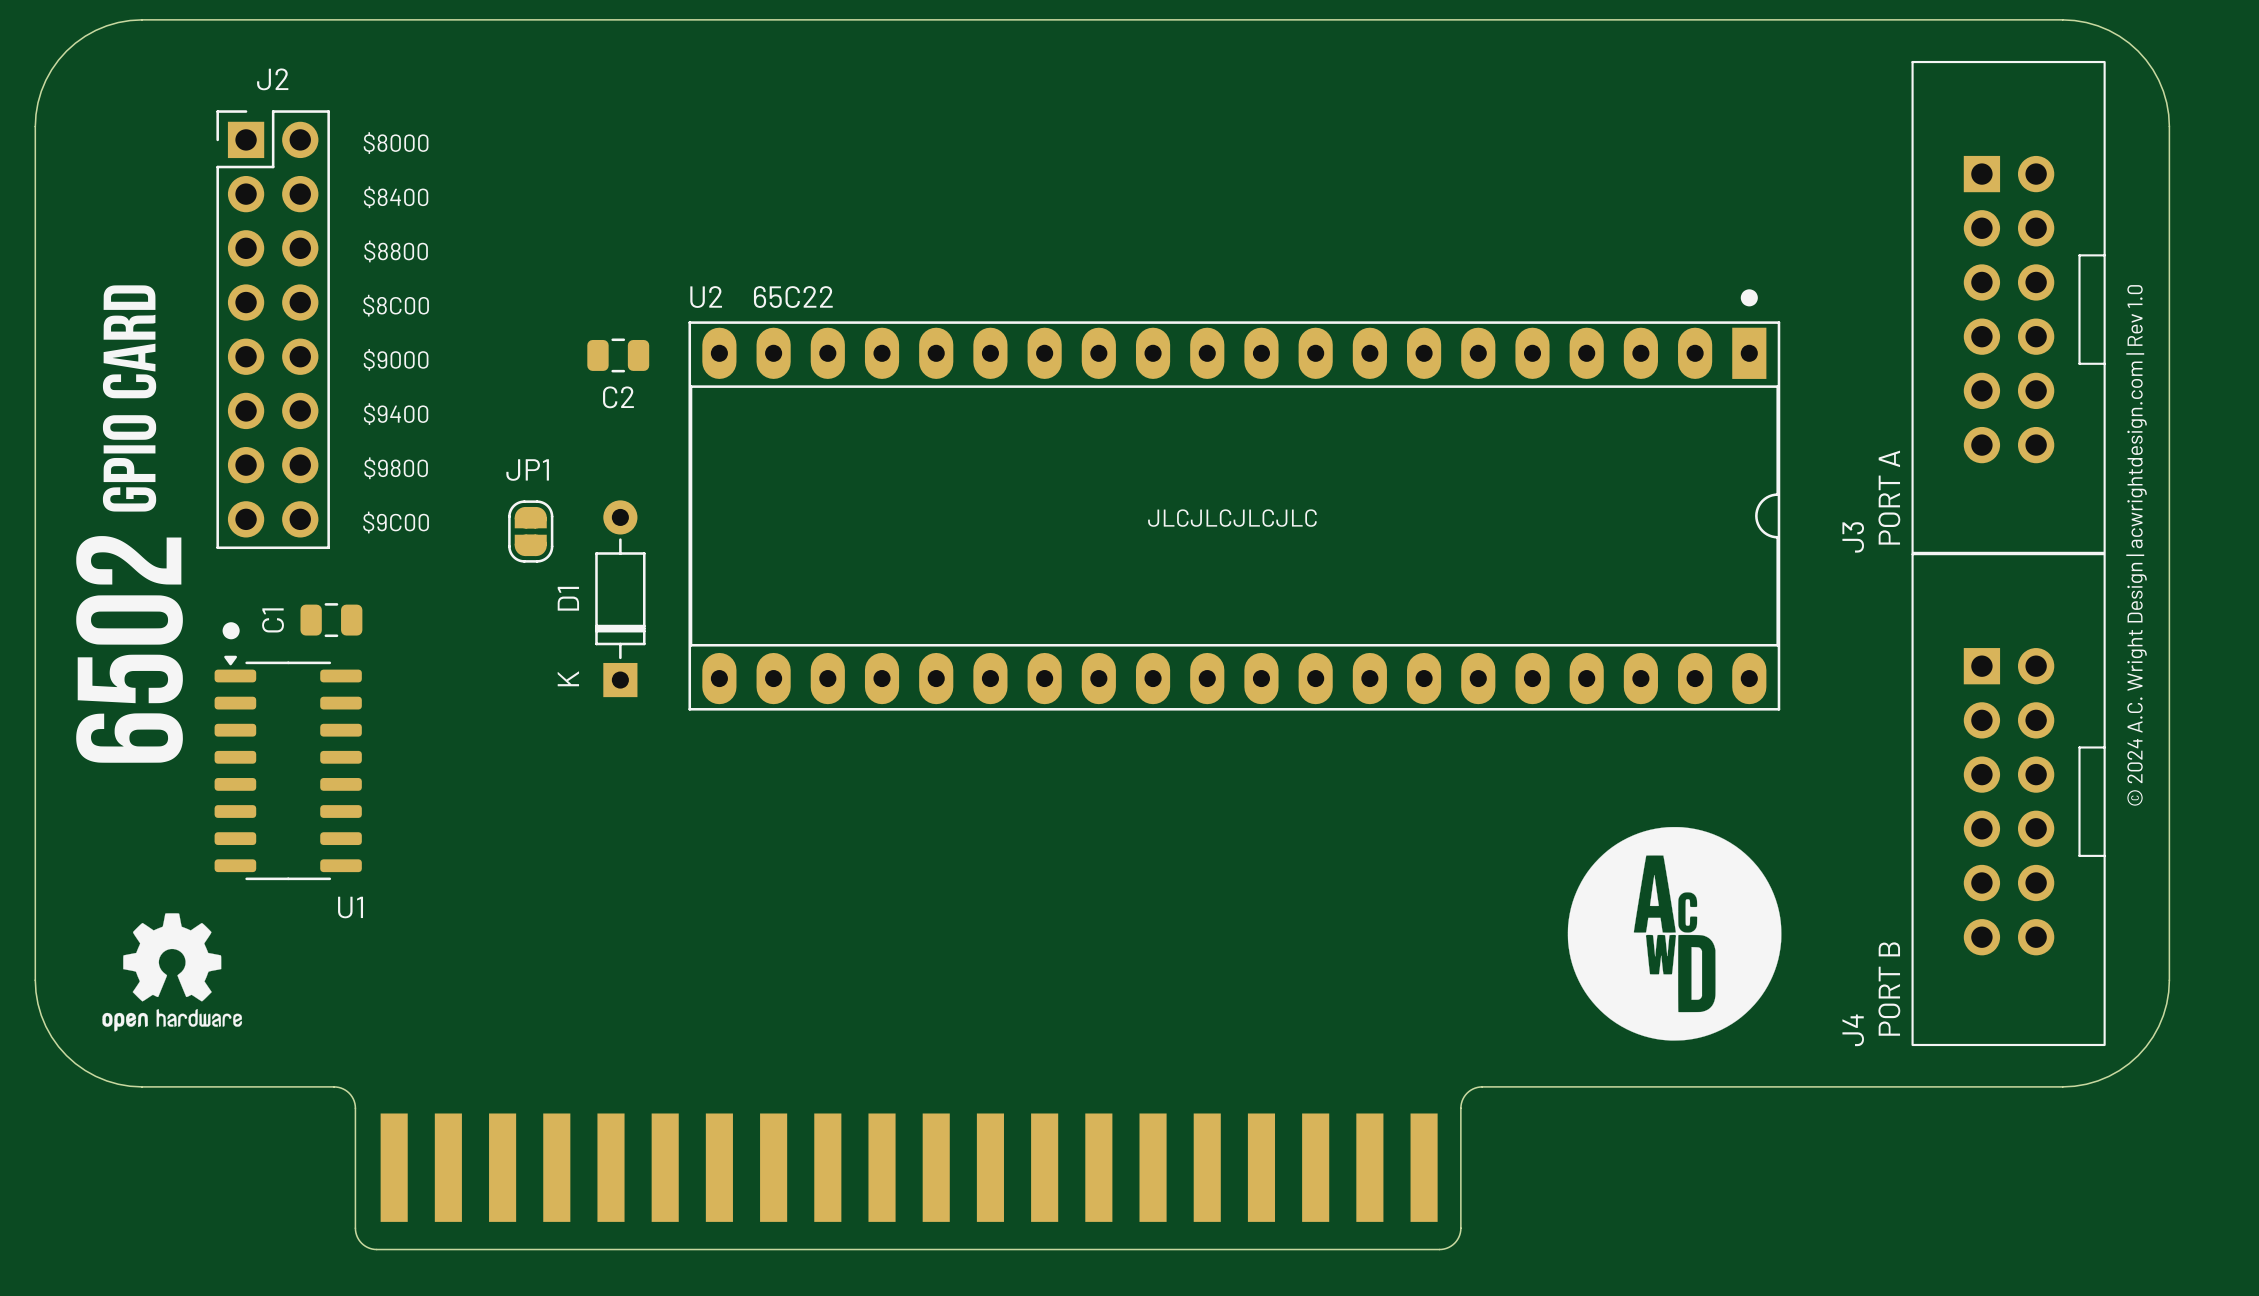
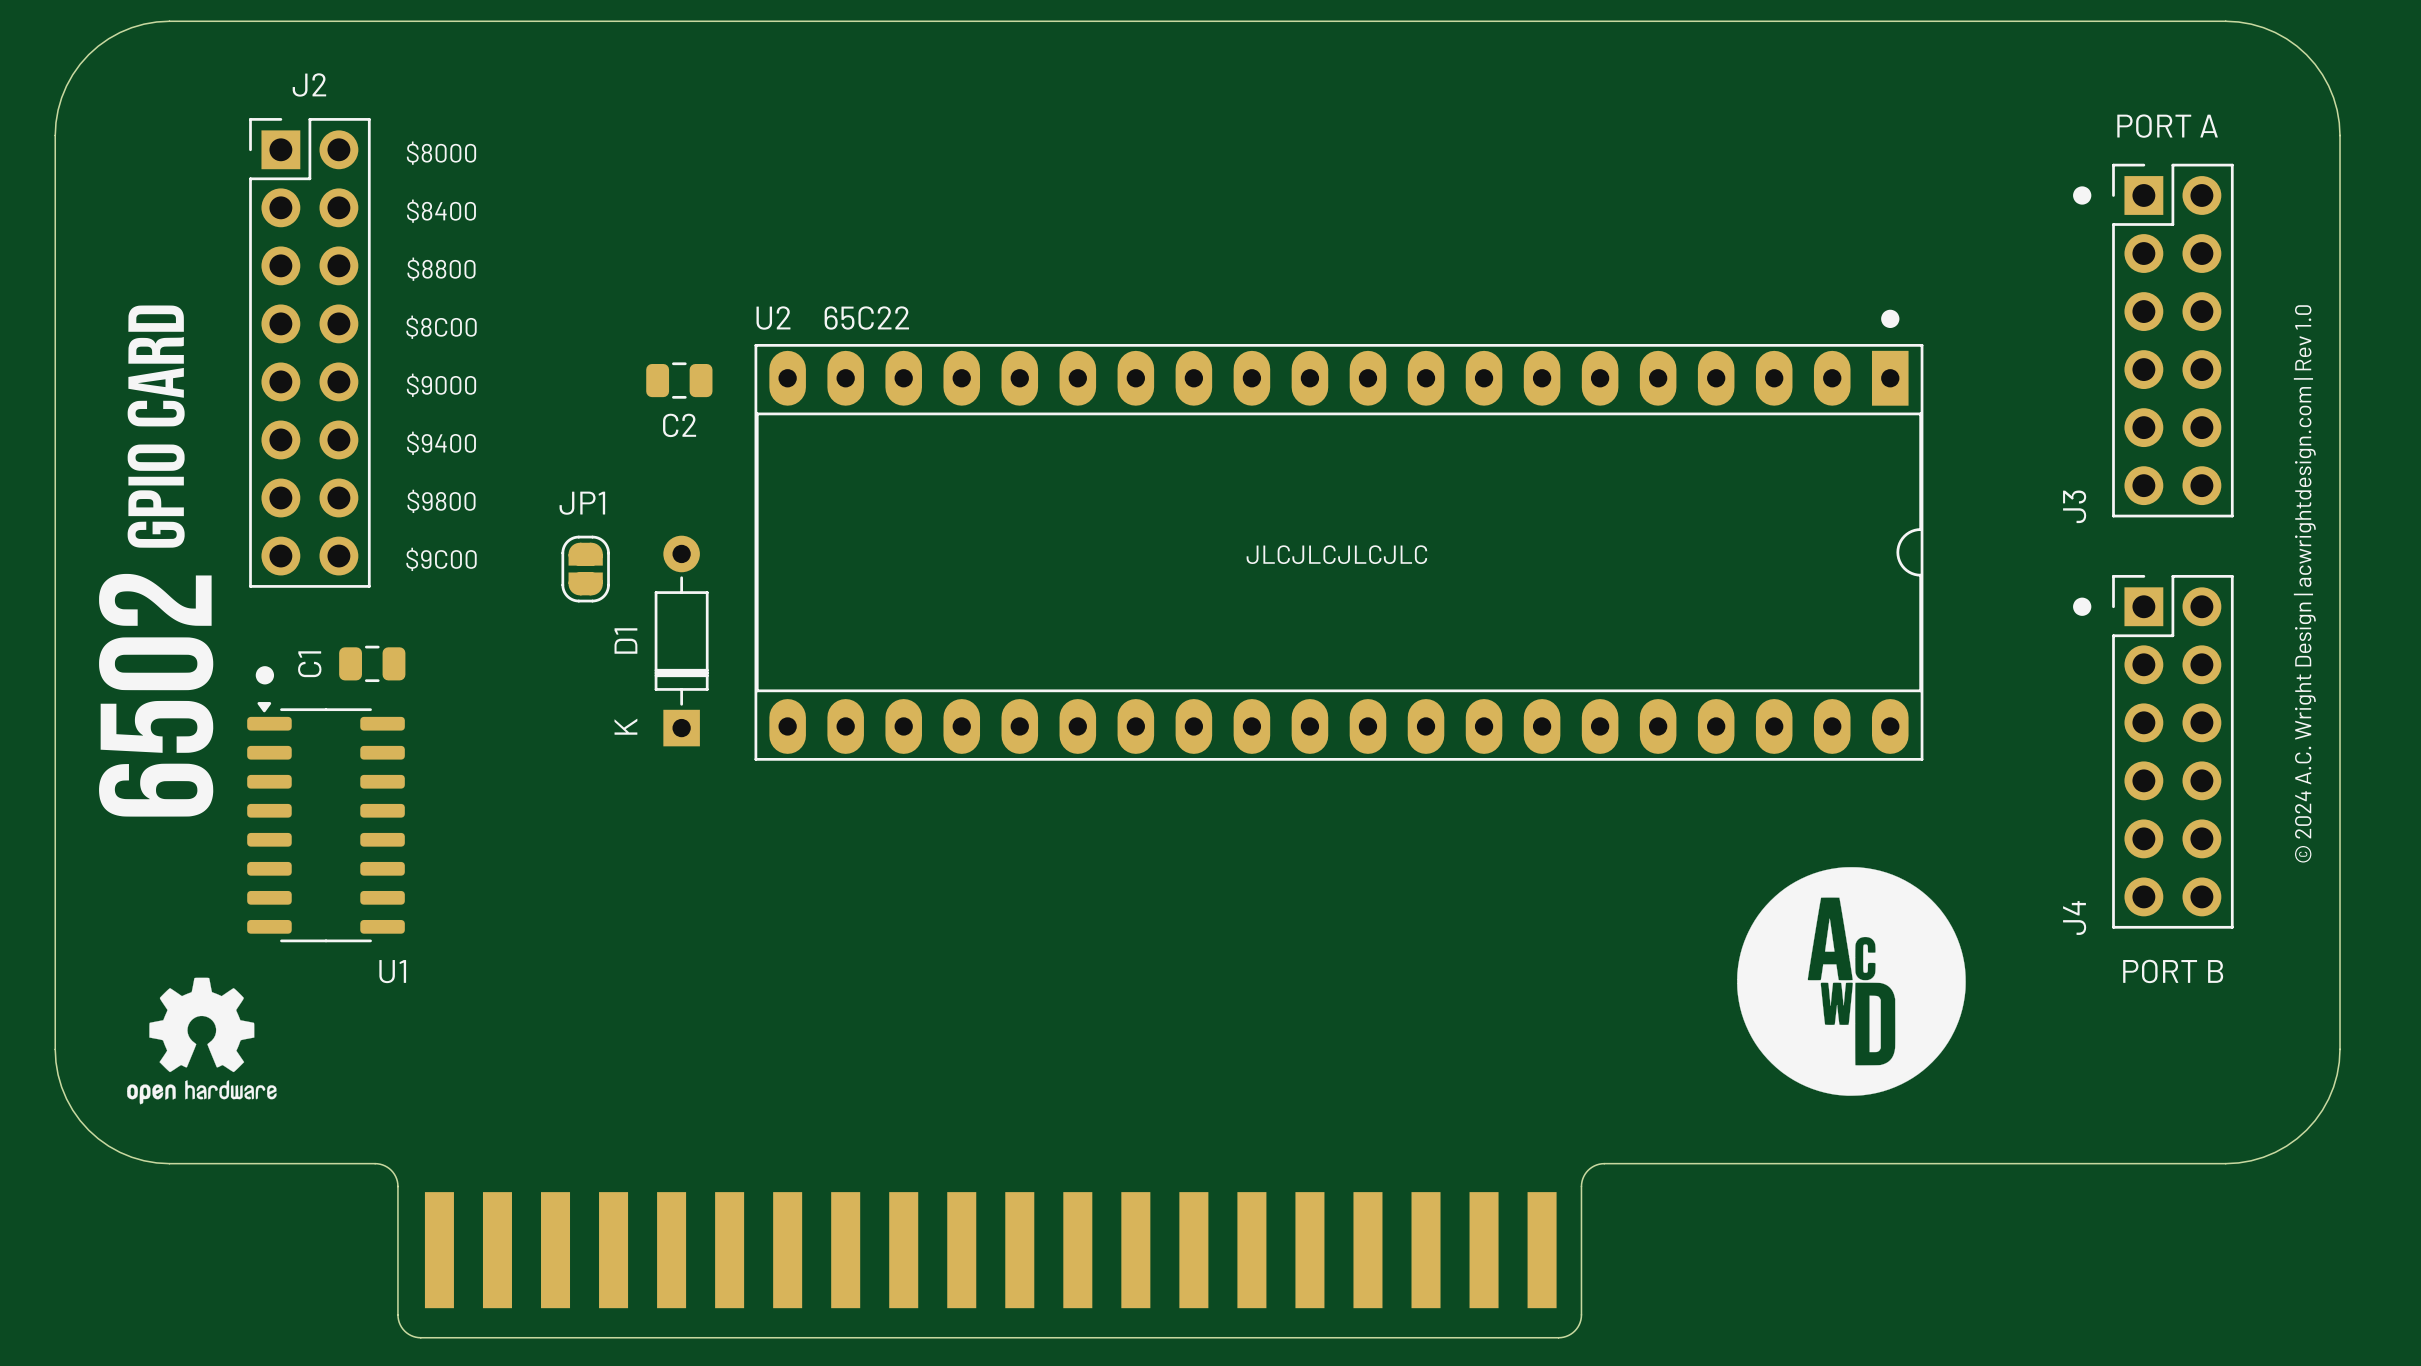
J3 footprint: [1911, 60, 2106, 554] -> [2112, 163, 2234, 518]
drawing: none -> [2073, 186, 2092, 205]
J3 value position: PORT A (1889, 497) -> PORT A (2167, 126)
J3 name position: J3 (1853, 537) -> J3 (2074, 506)
J4 footprint: [1911, 553, 2106, 1047] -> [2112, 574, 2234, 929]
drawing: none -> [2073, 597, 2092, 616]
drawing position: (1674, 933) -> (1851, 981)
J4 value position: PORT B (1889, 989) -> PORT B (2173, 971)
J4 name position: J4 (1853, 1030) -> J4 (2074, 917)

